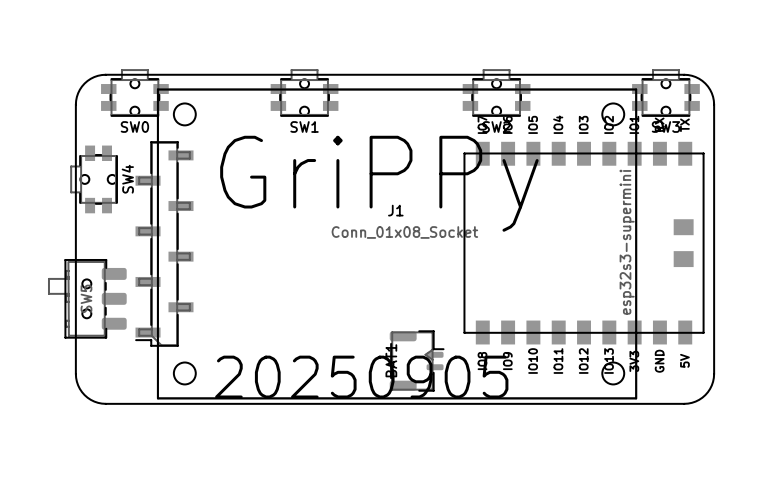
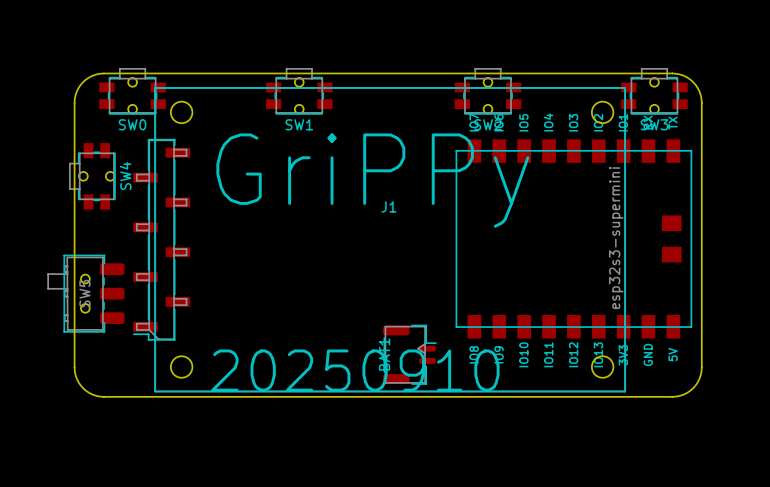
J1 value: Conn_01x08_Socket (404, 232) -> none
text: 20250905 (361, 377) -> 20250910 (355, 370)

